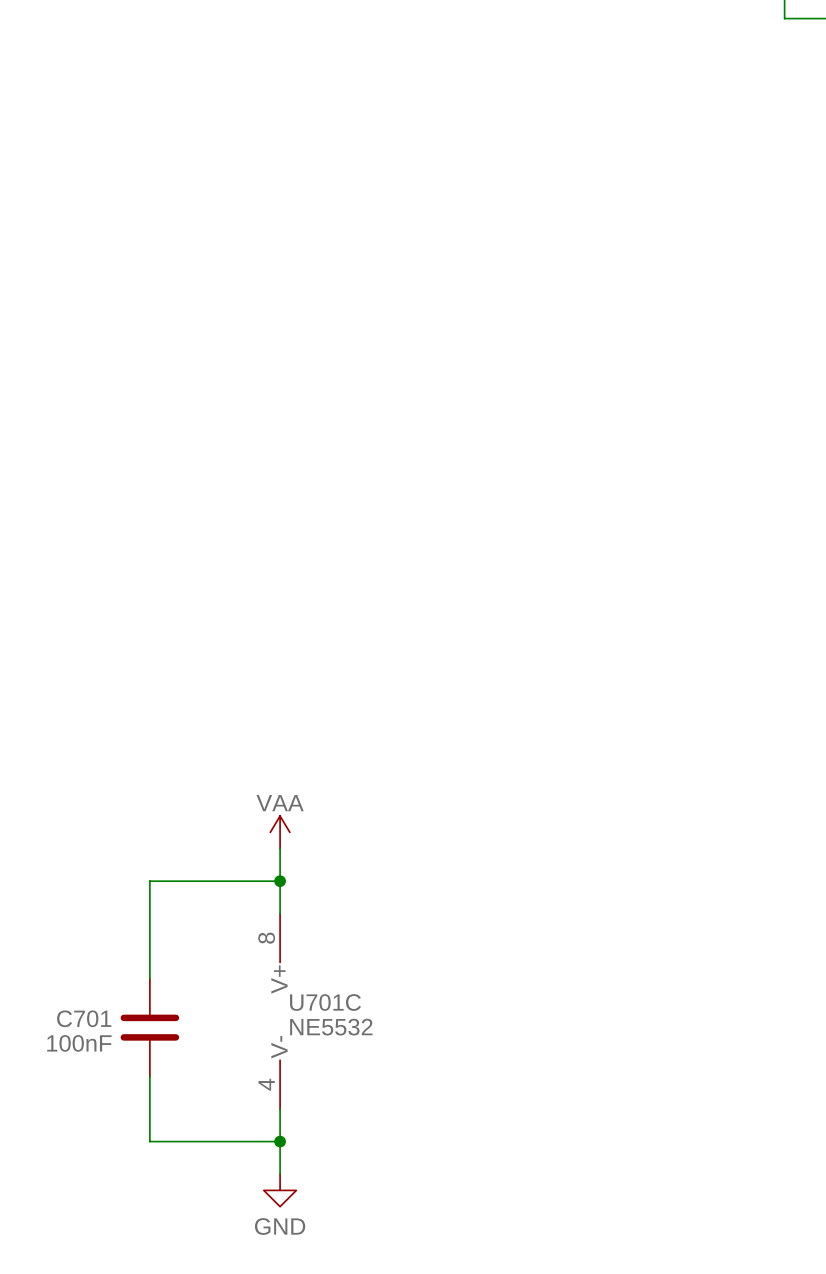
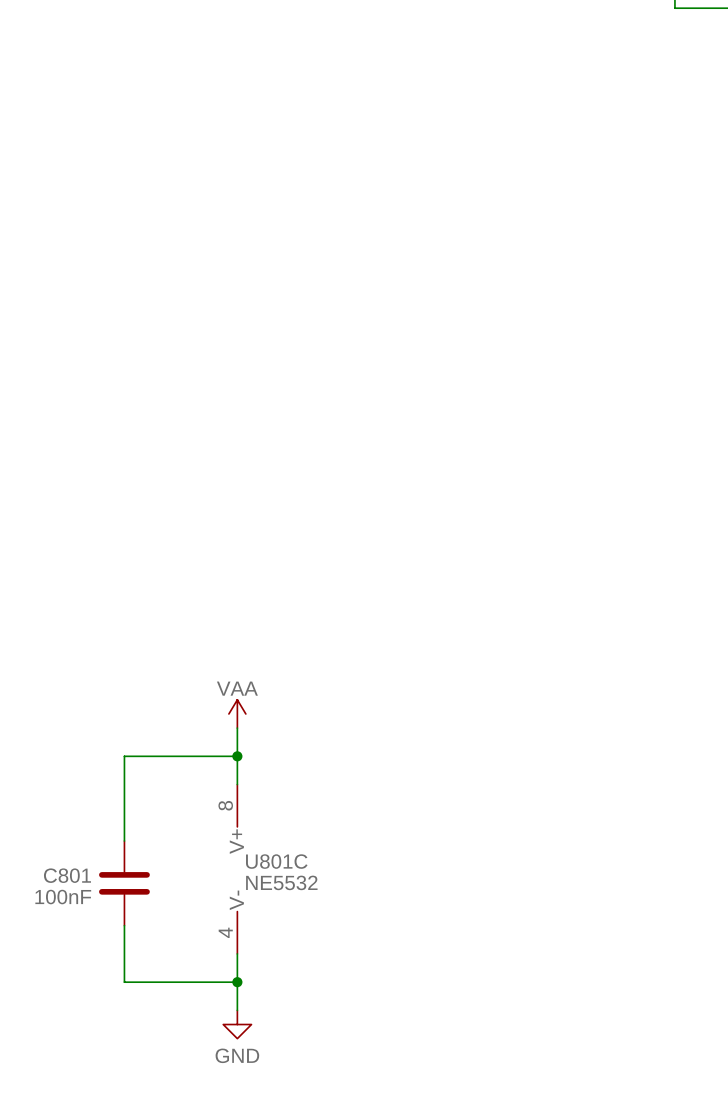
U701C name: U701C (325, 1002) -> U801C (276, 861)
C701 name: C701 (84, 1018) -> C801 (67, 875)

